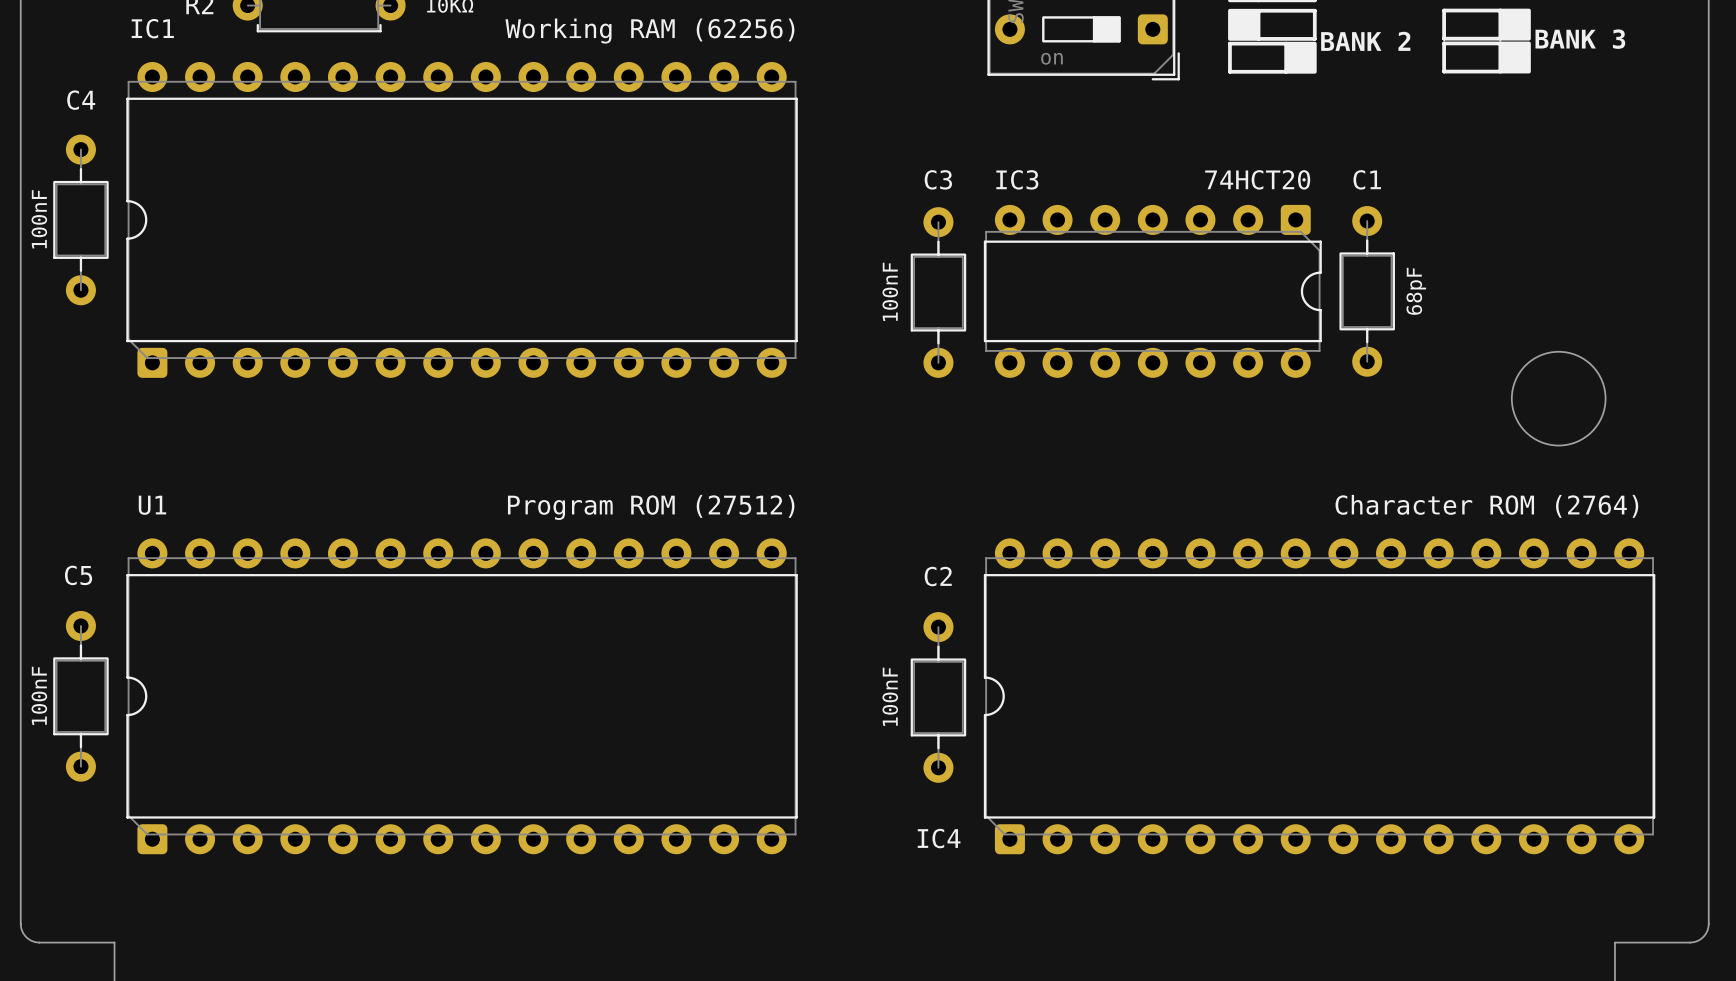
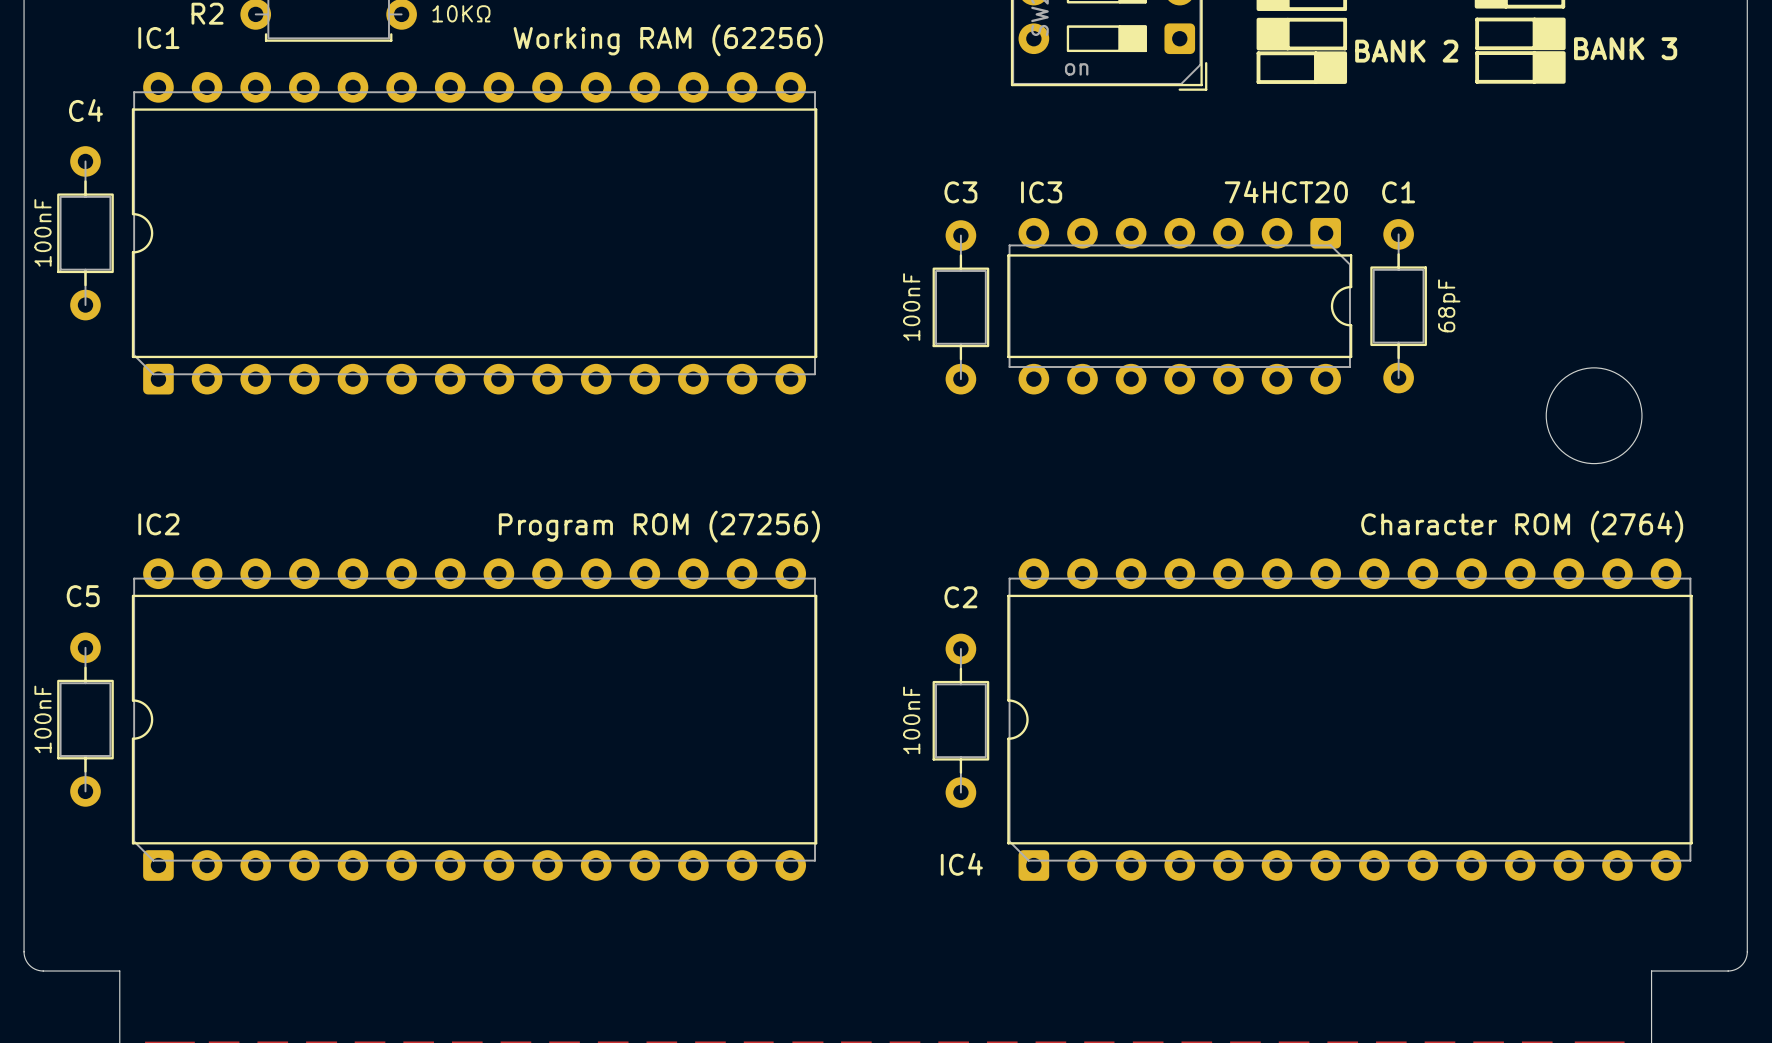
U1 name: U1 (152, 505) -> IC2 (158, 524)
U1 value: Program ROM (27512) (651, 507) -> Program ROM (27256) (659, 526)

